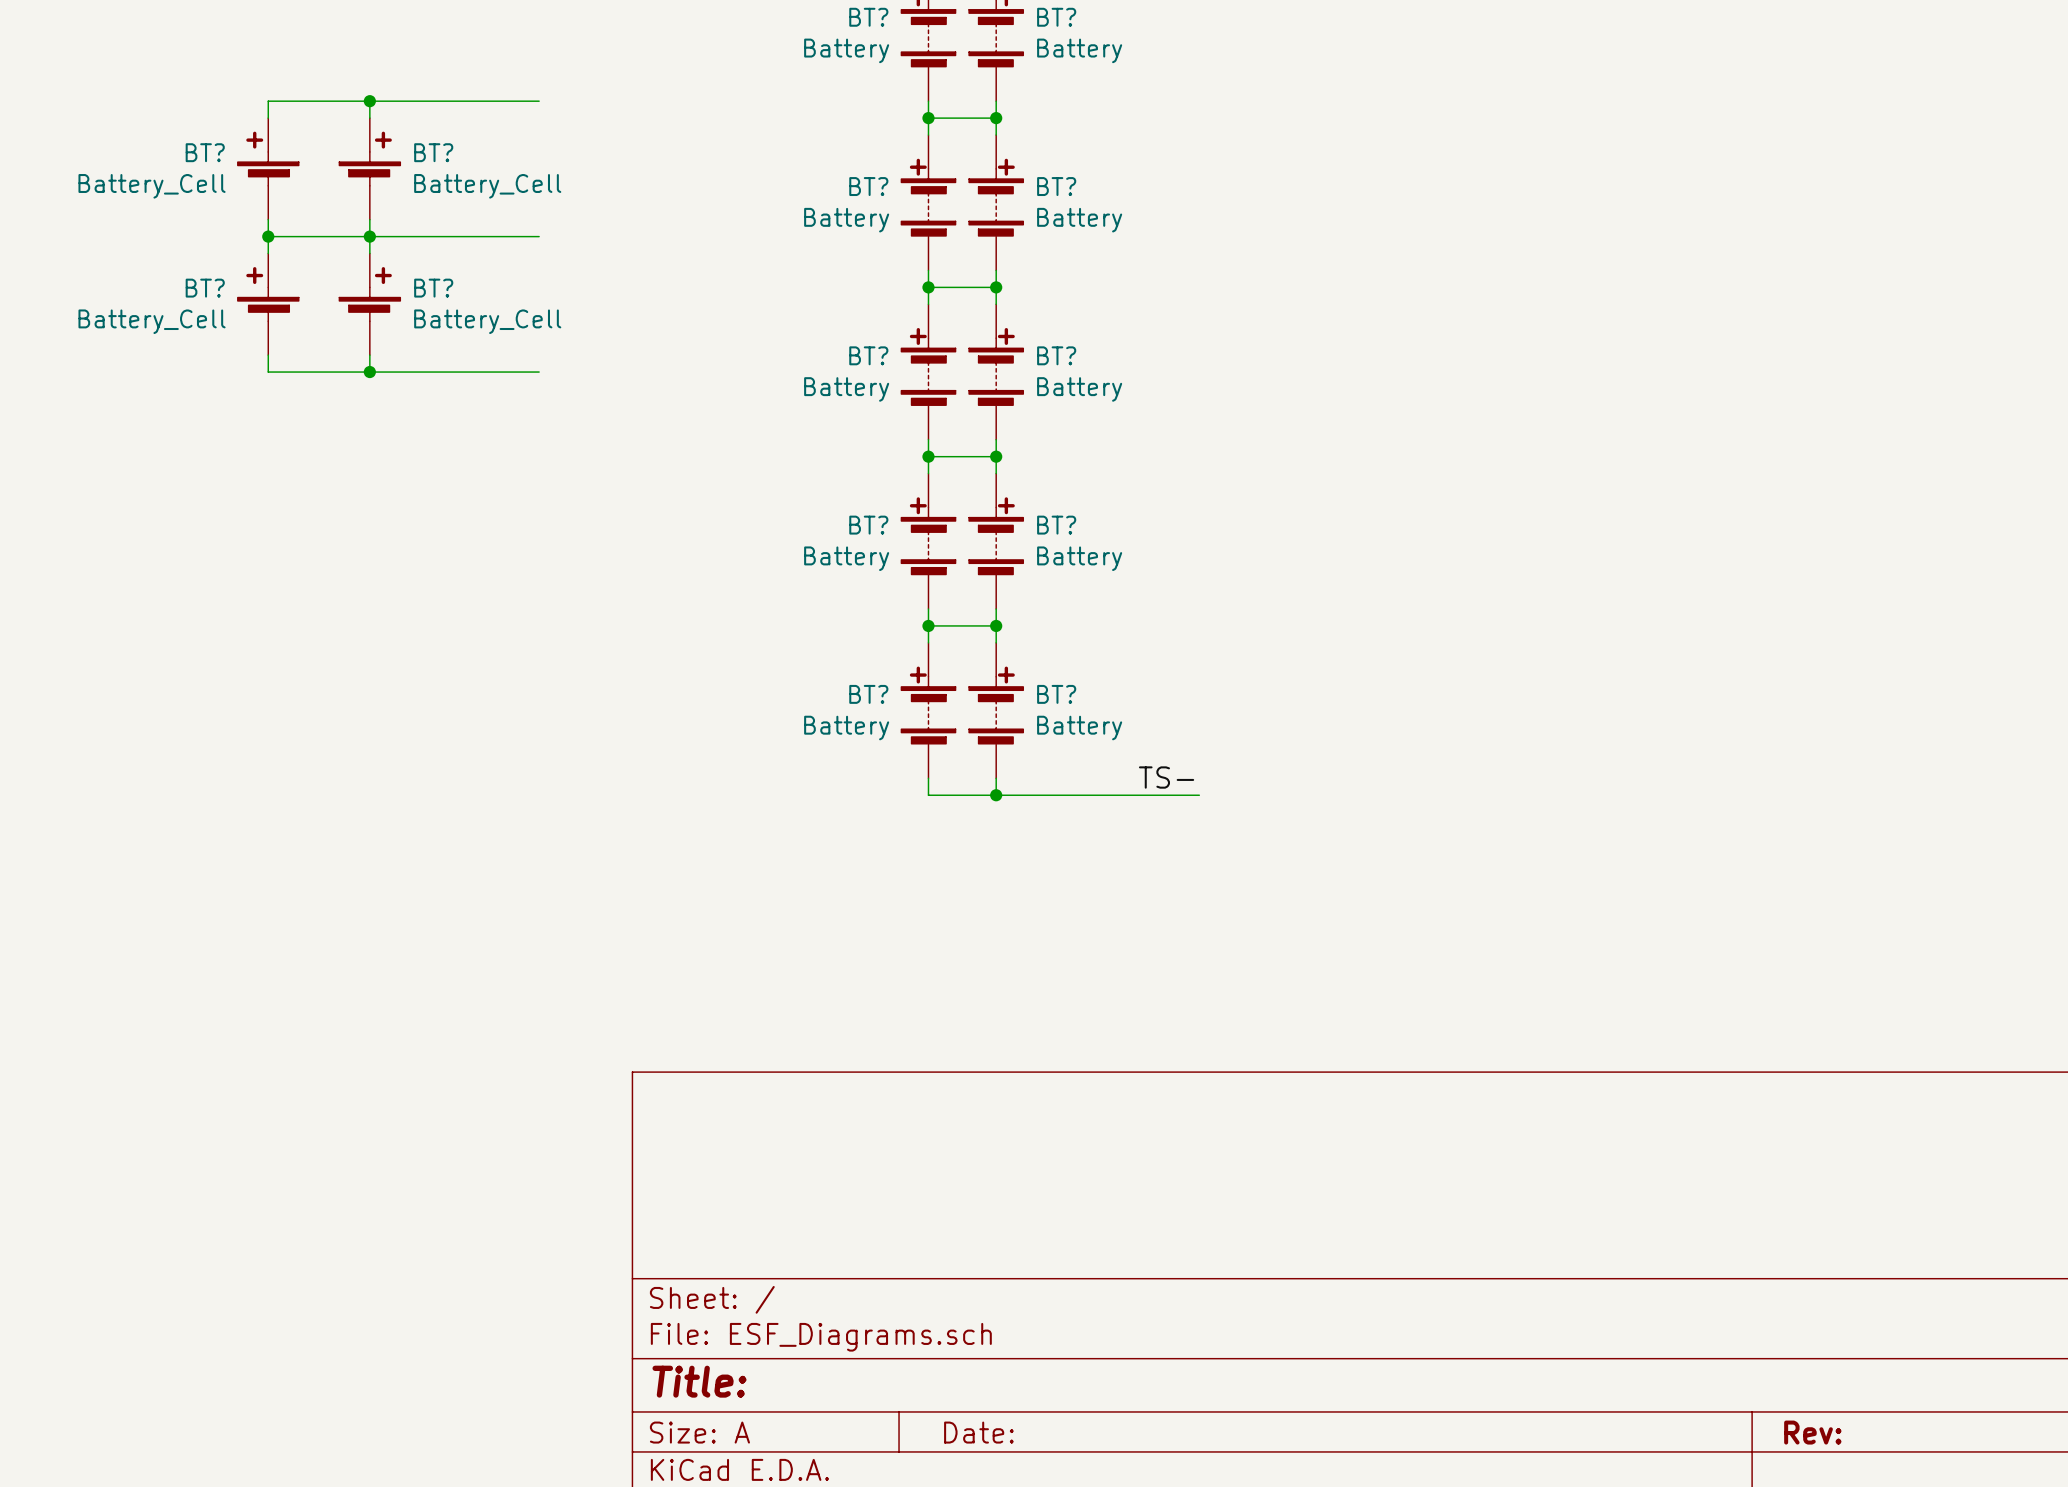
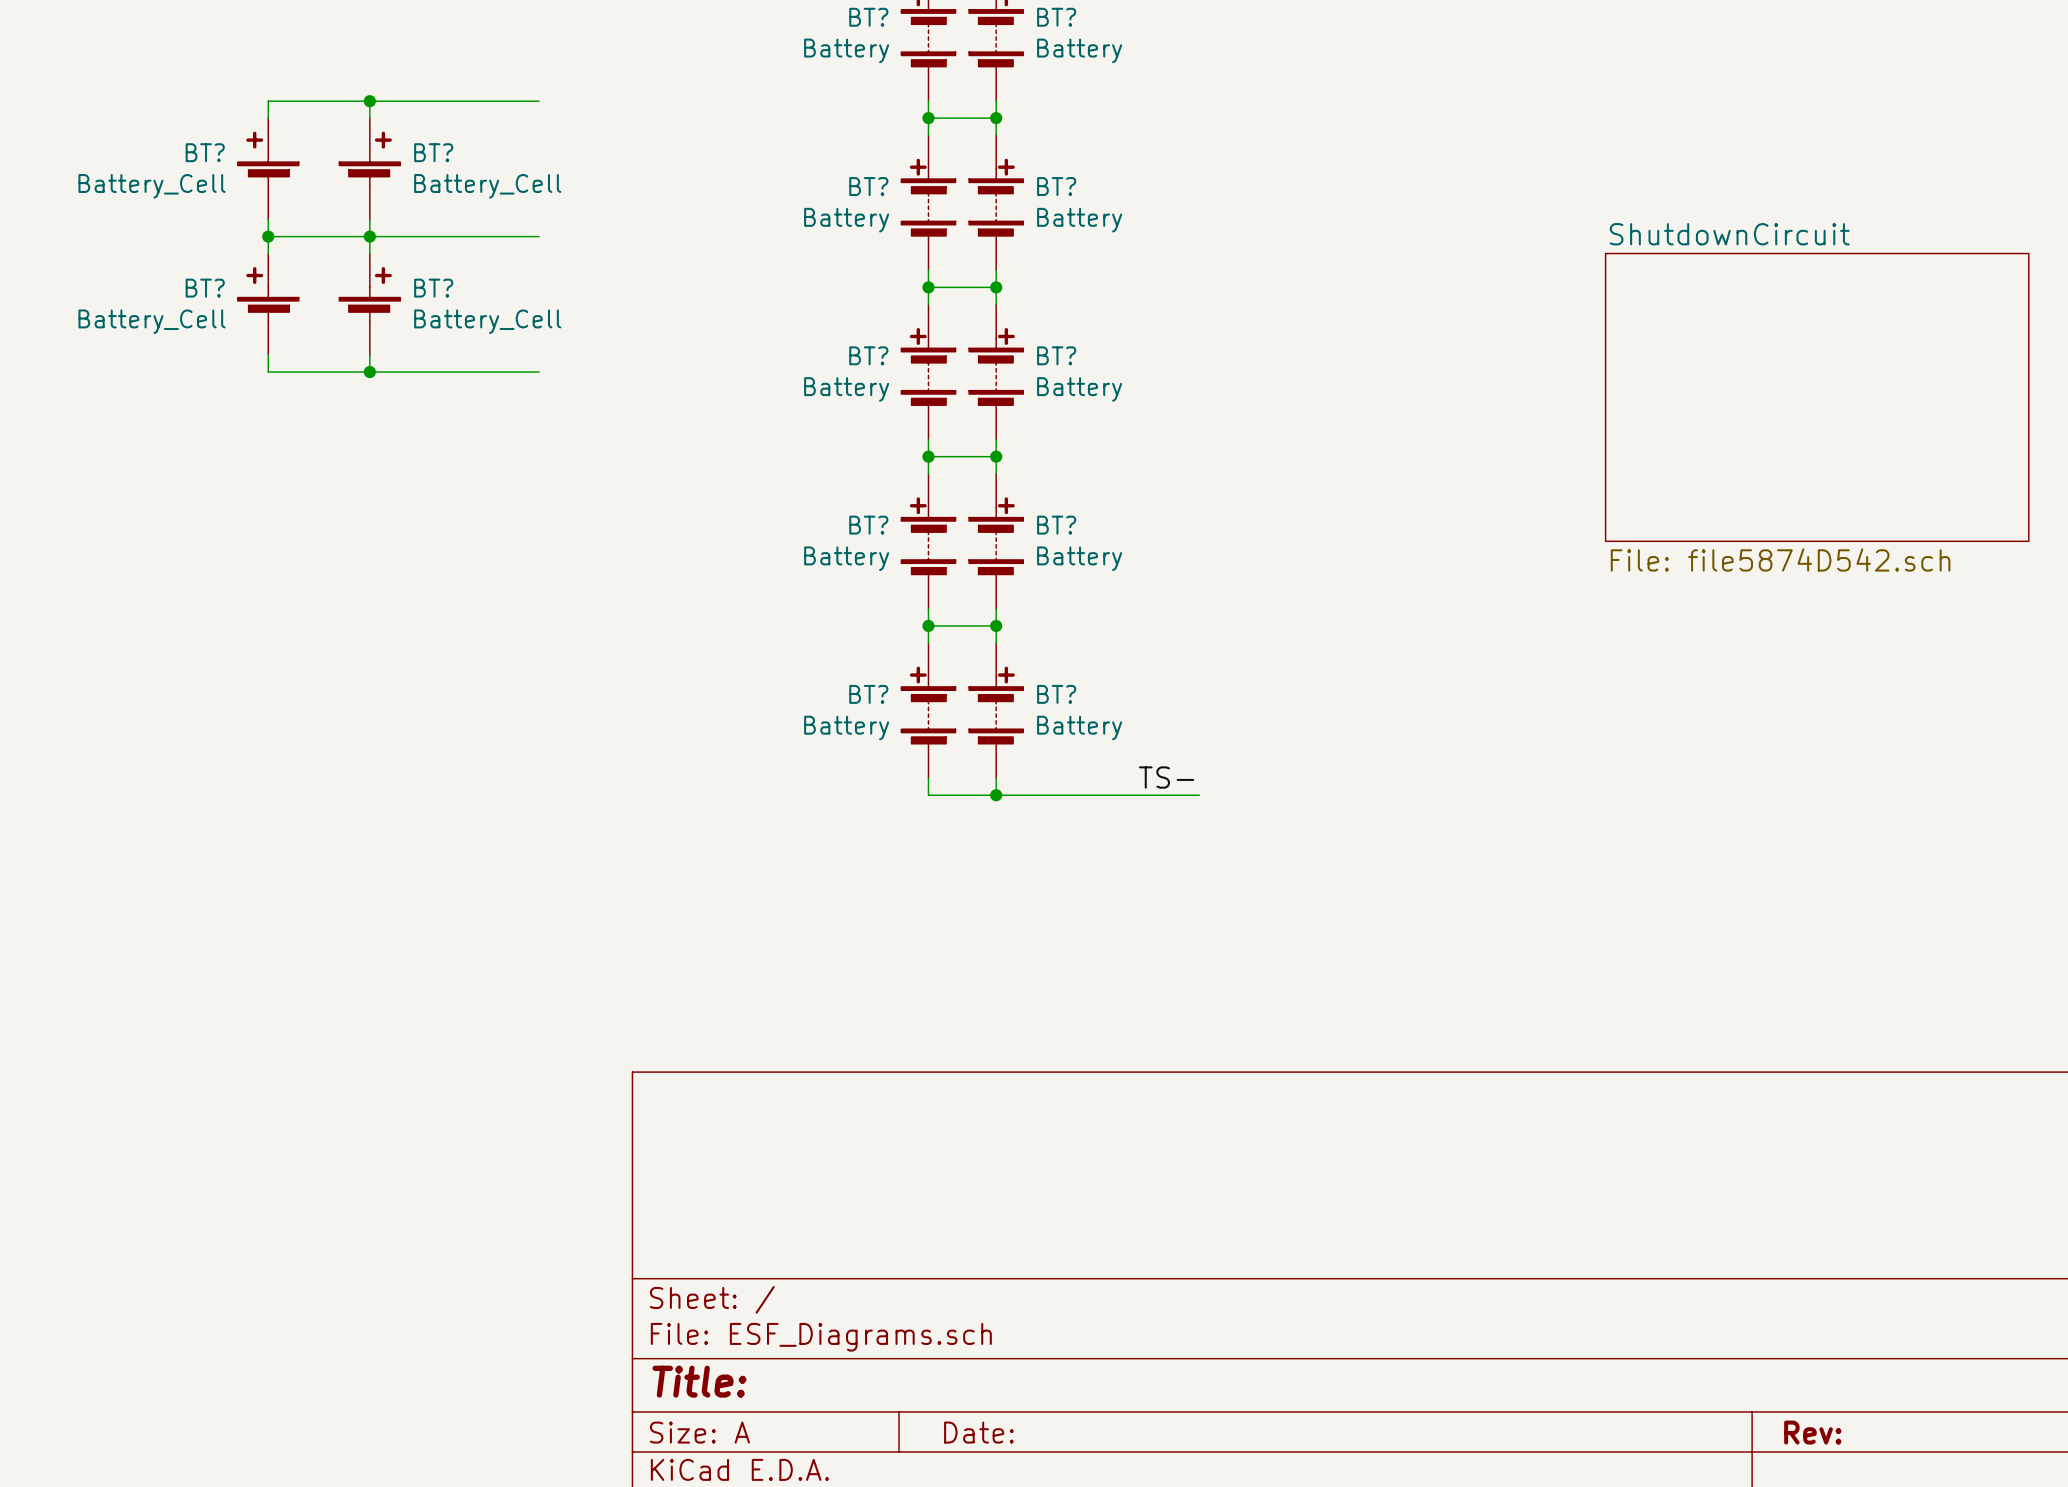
sheet ShutdownCircuit: none -> File: file5874D542.sch (1817, 397)

